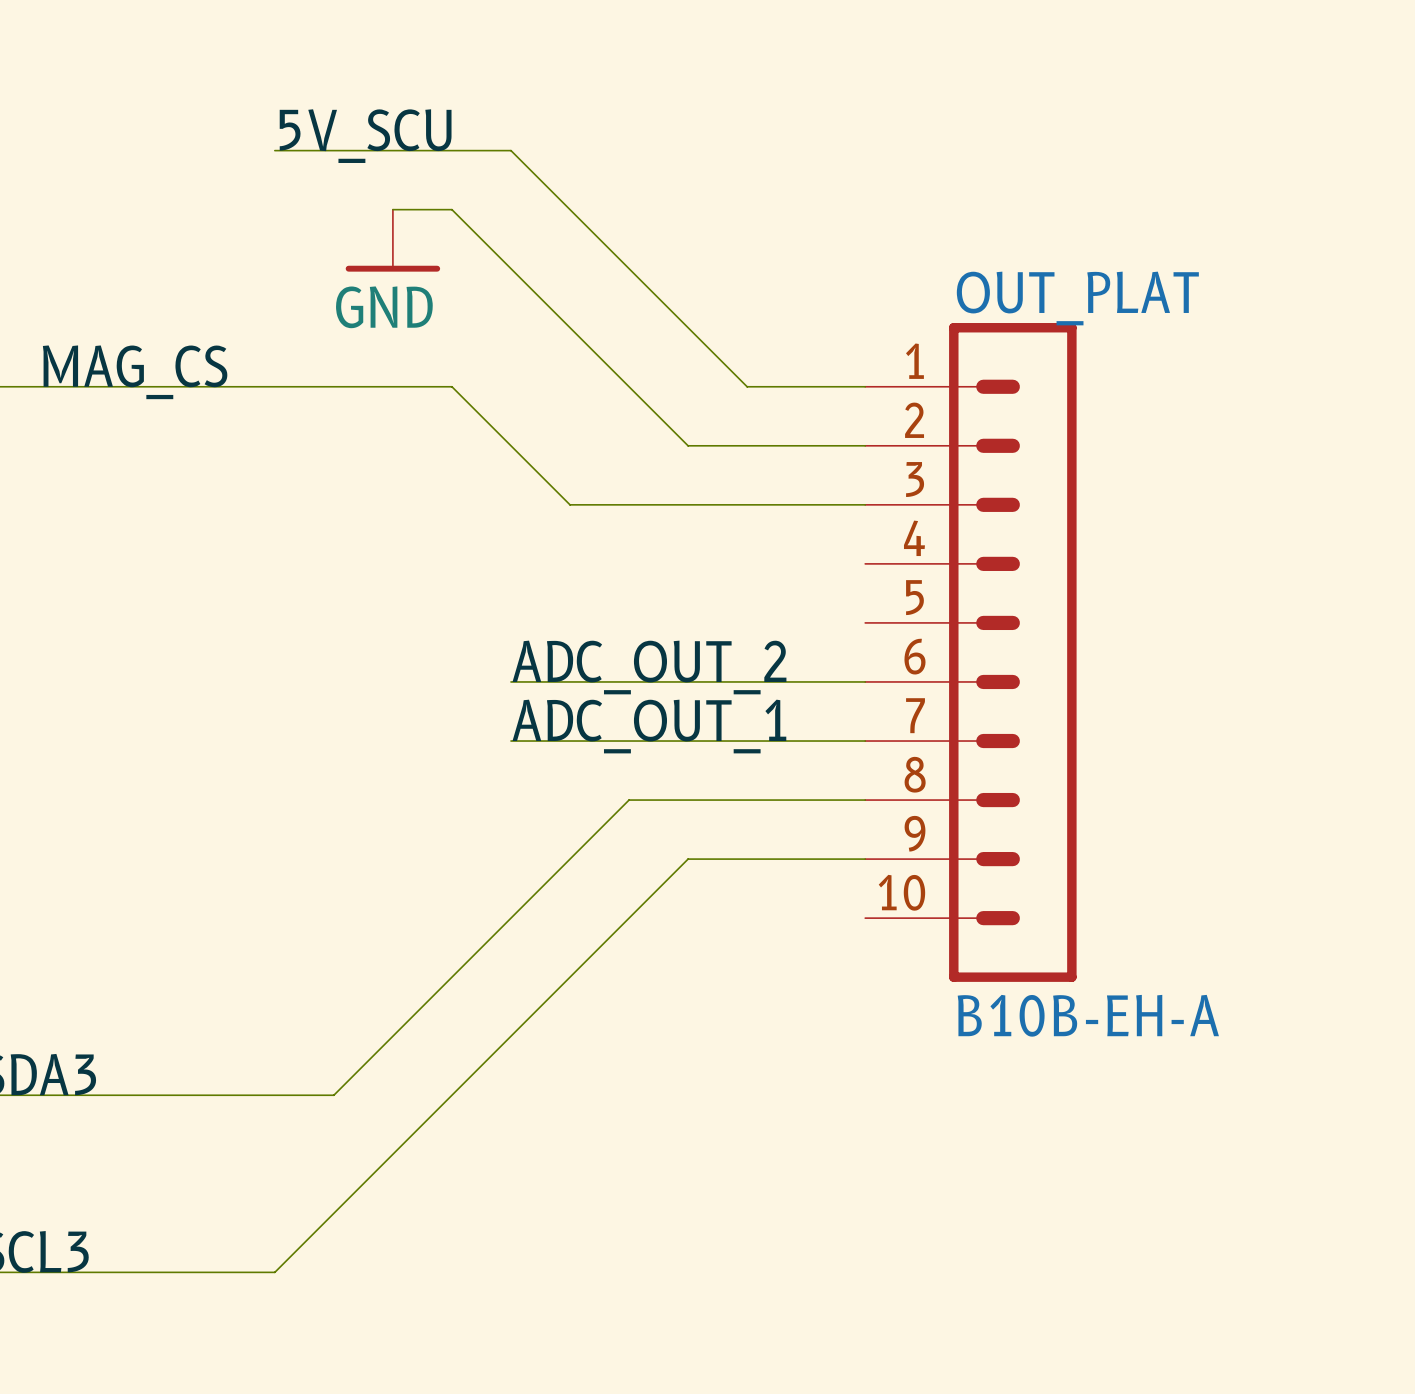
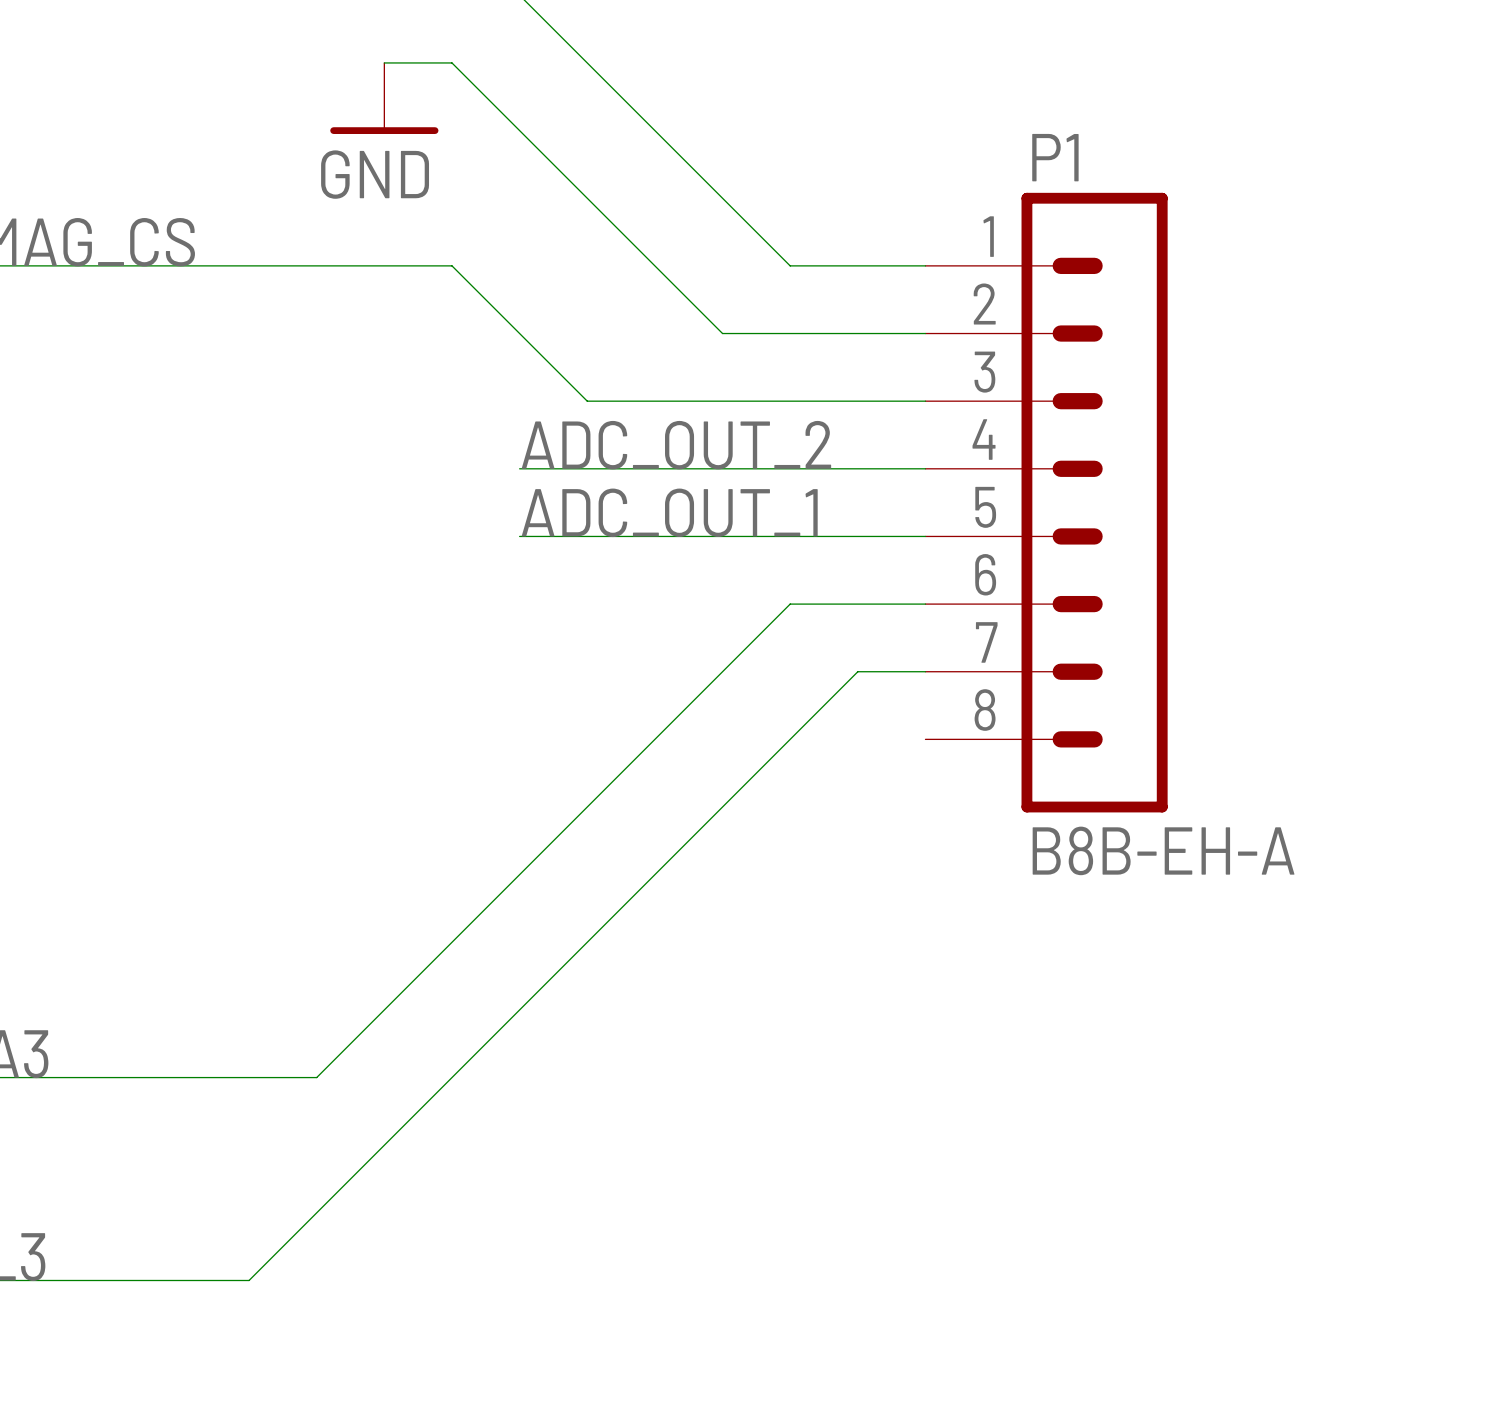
wire: none -> (519, 468) (925, 468)
P1: none -> B8B-EH-A (1046, 502)
wire: none -> (519, 536) (925, 536)
OUT_PLAT: B10B-EH-A (970, 652) -> none
label position: ADC_OUT_2 (649, 667) -> ADC_OUT_2 (676, 445)
wire: (510, 681) (747, 681) -> (654, 739) (790, 604)
label position: ADC_OUT_1 (649, 726) -> ADC_OUT_1 (669, 512)
wire: (510, 741) (806, 741) -> none
wire: (629, 800) (865, 800) -> none
wire: (688, 859) (865, 859) -> (722, 807) (857, 671)

